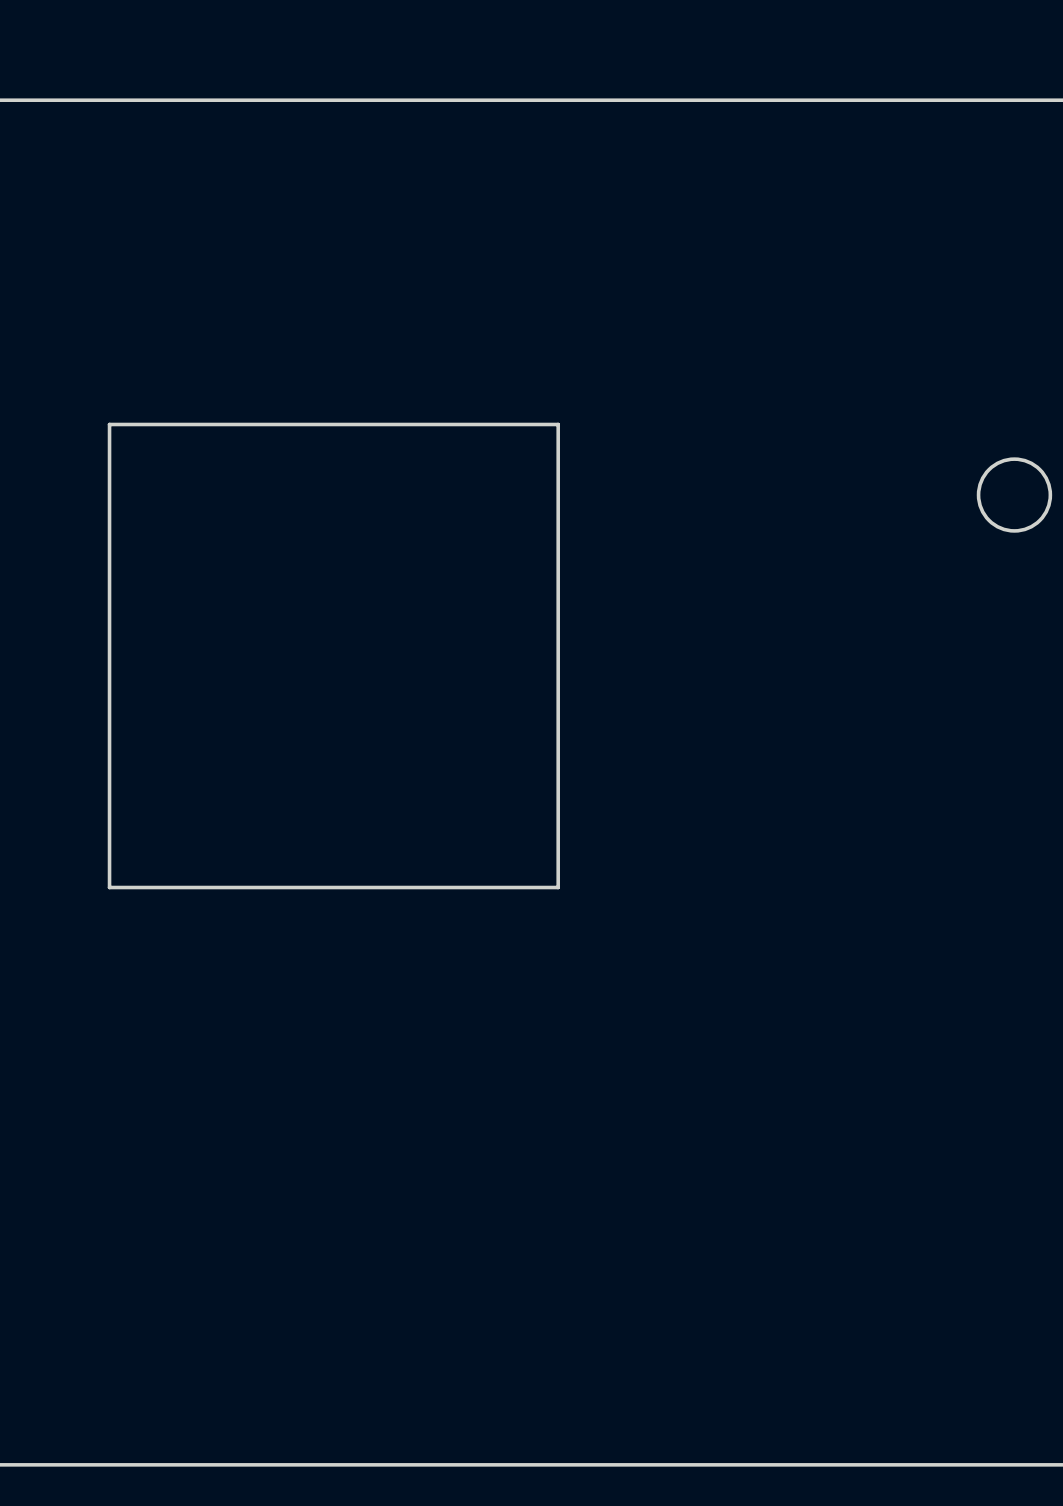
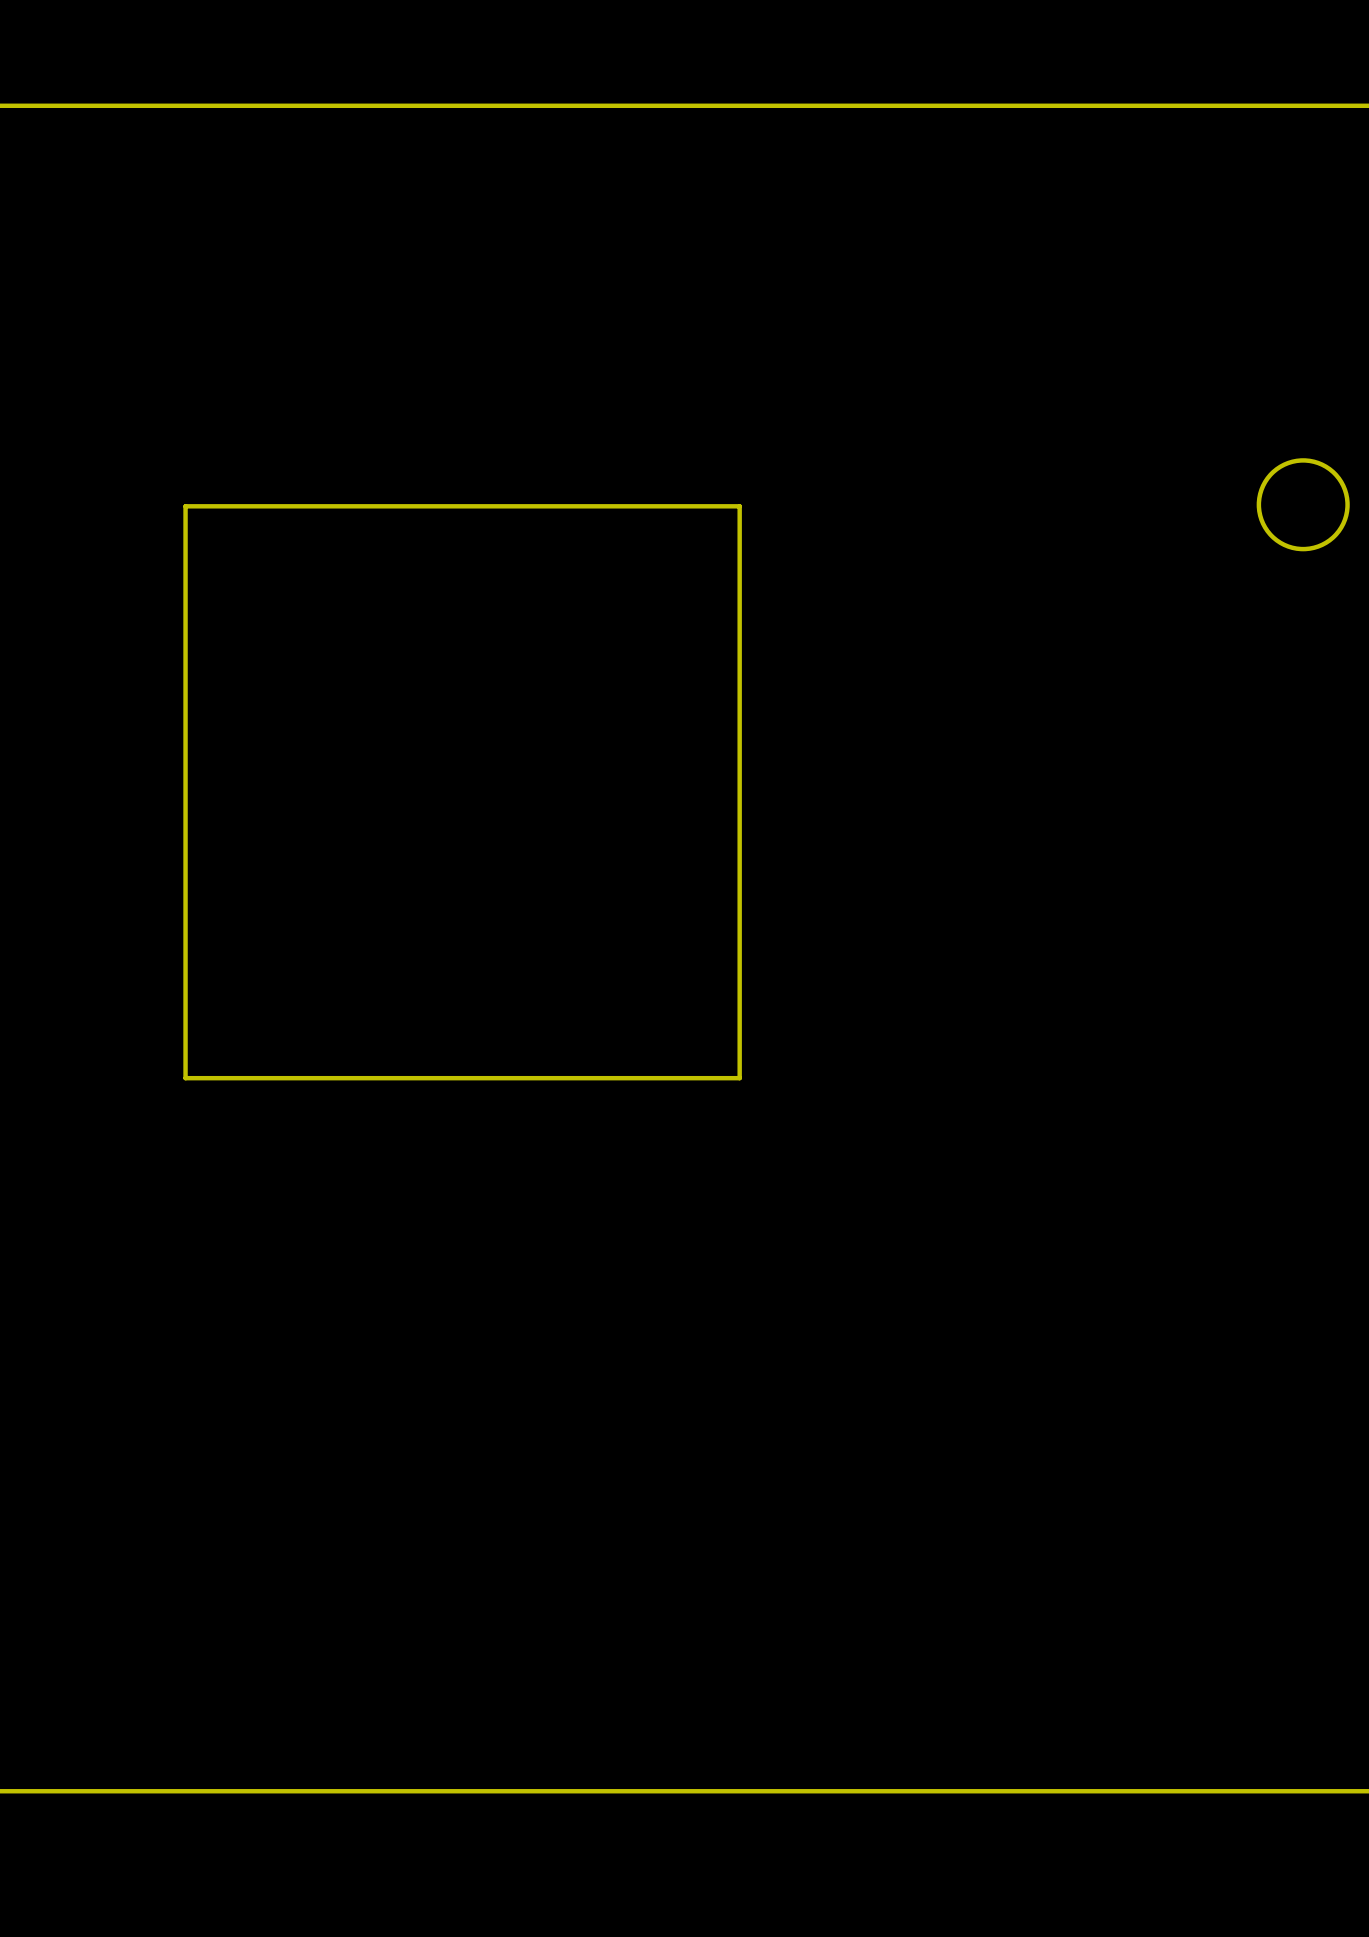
round board edge position: (1014, 495) -> (1303, 504)

